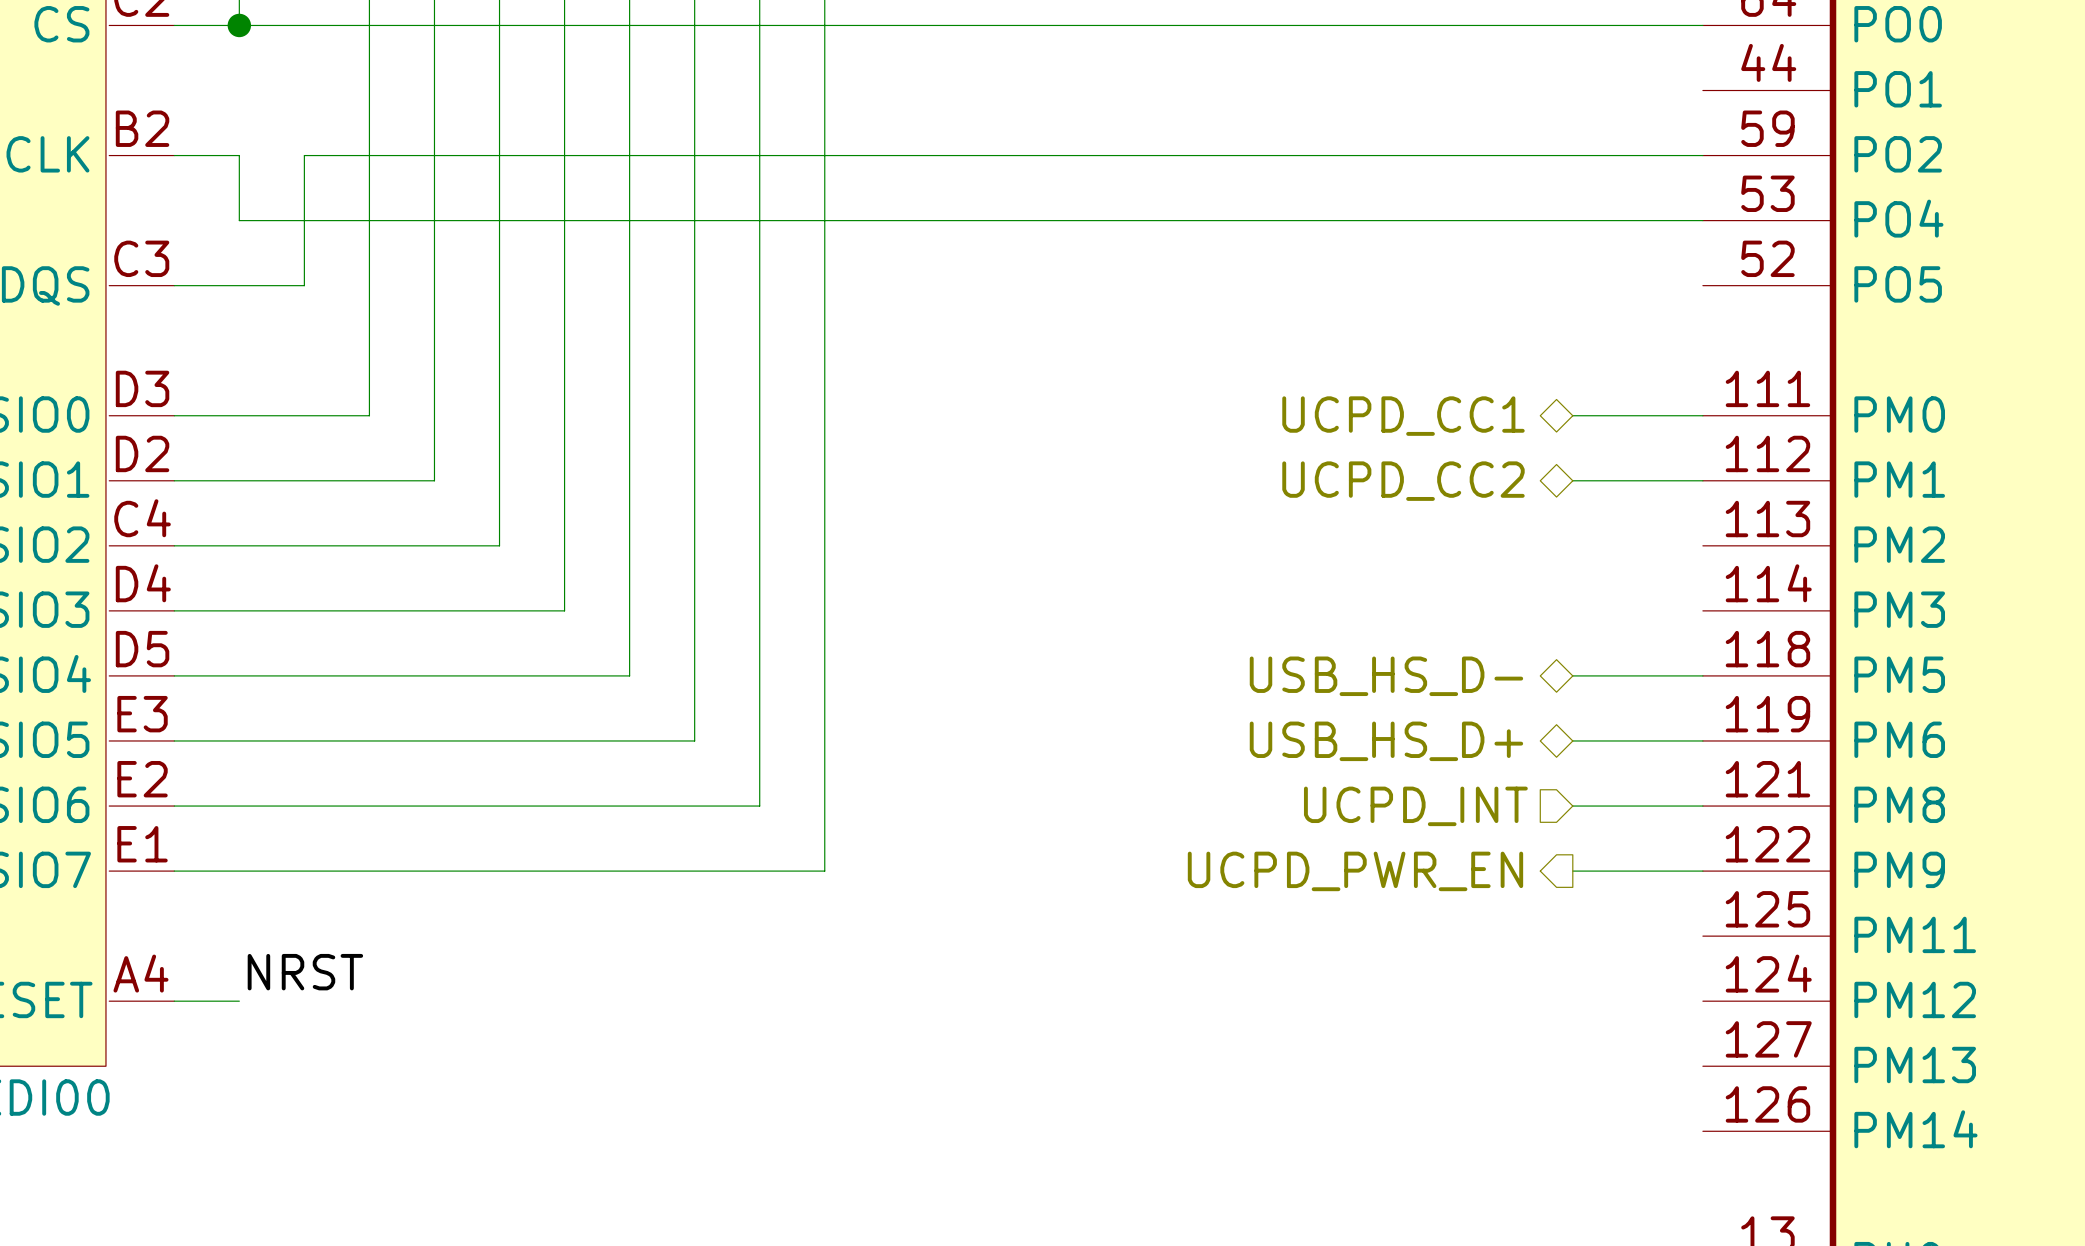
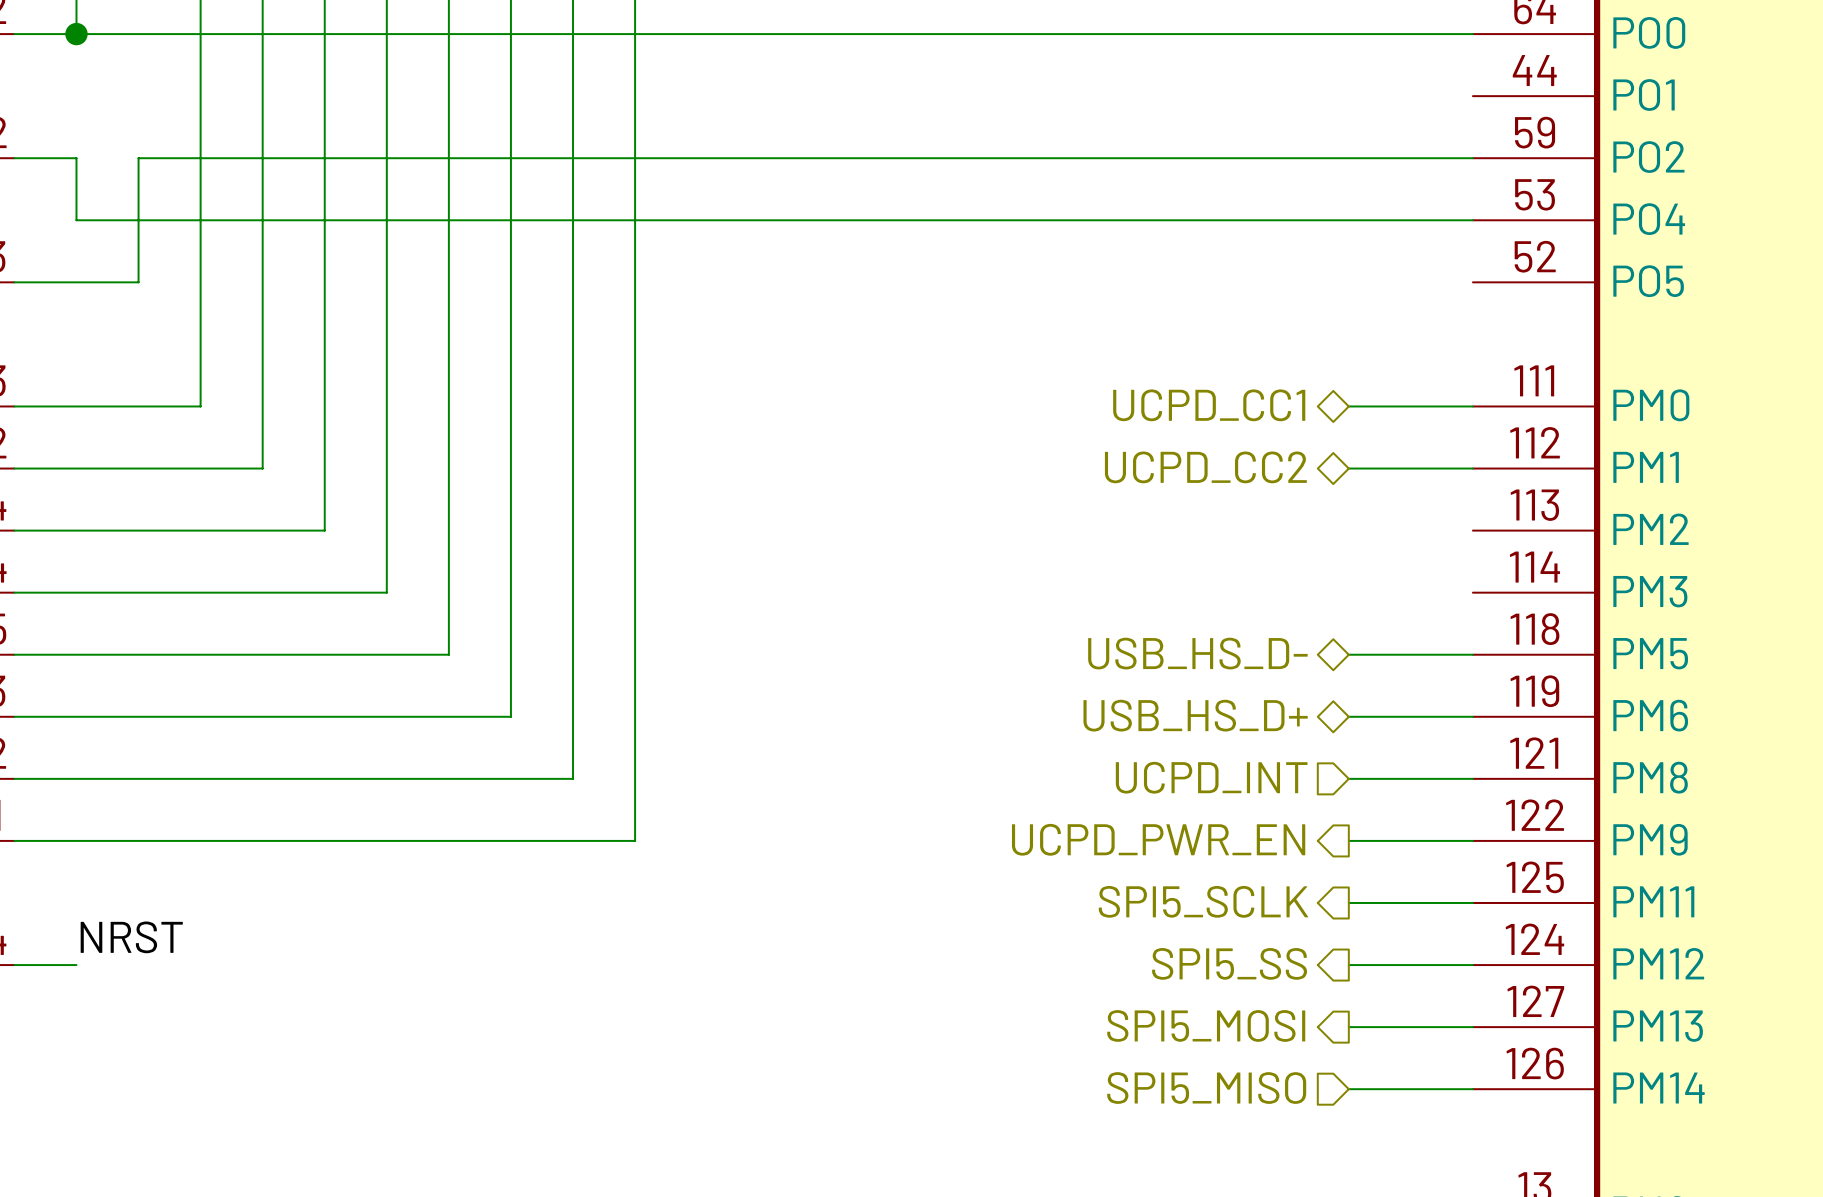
hierarchical label: none -> SPI5_SCLK (1203, 901)
wire: none -> (1348, 902) (1472, 902)
hierarchical label: none -> SPI5_SS (1229, 963)
wire: none -> (1348, 965) (1472, 965)
hierarchical label: none -> SPI5_MOSI (1206, 1025)
wire: none -> (1348, 1027) (1472, 1027)
hierarchical label: none -> SPI5_MISO (1206, 1088)
wire: none -> (1348, 1089) (1472, 1089)

